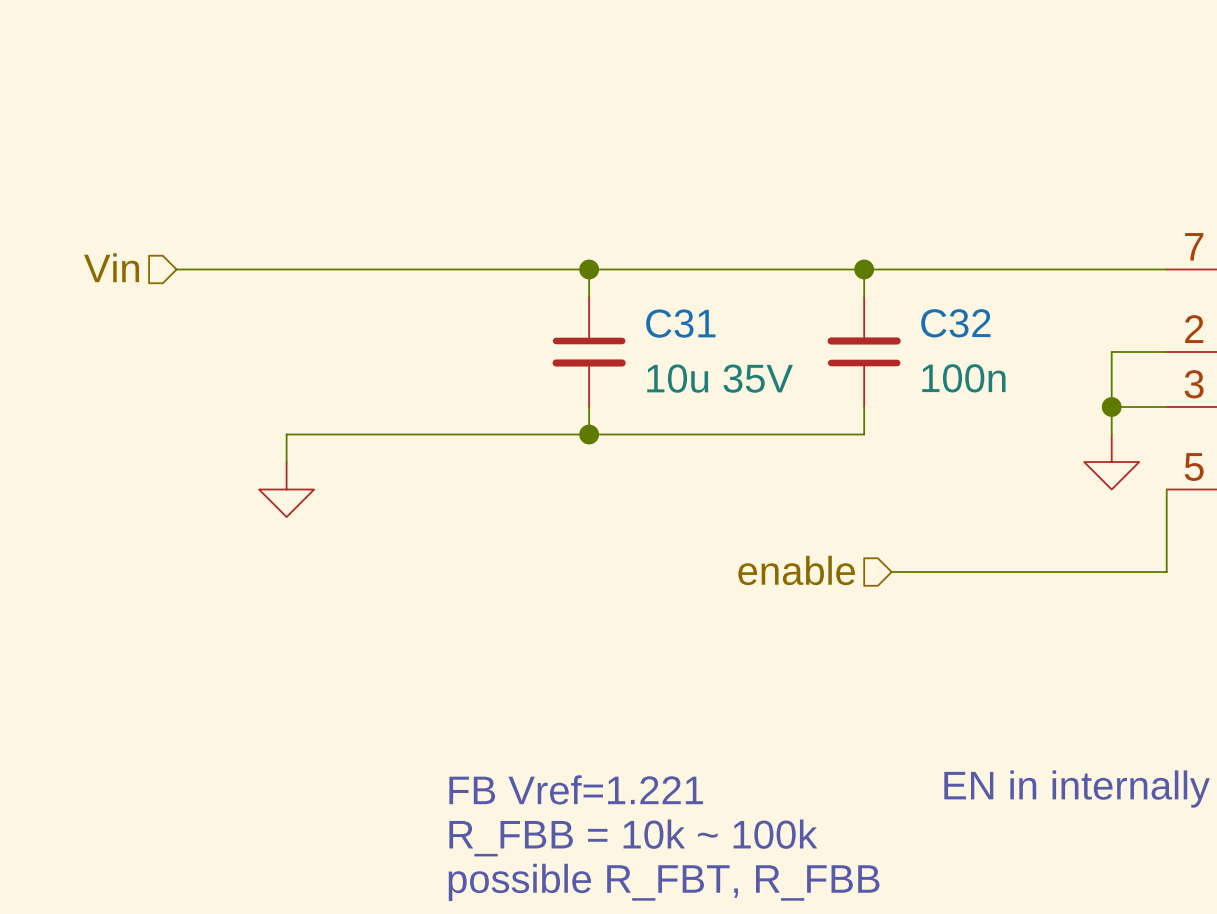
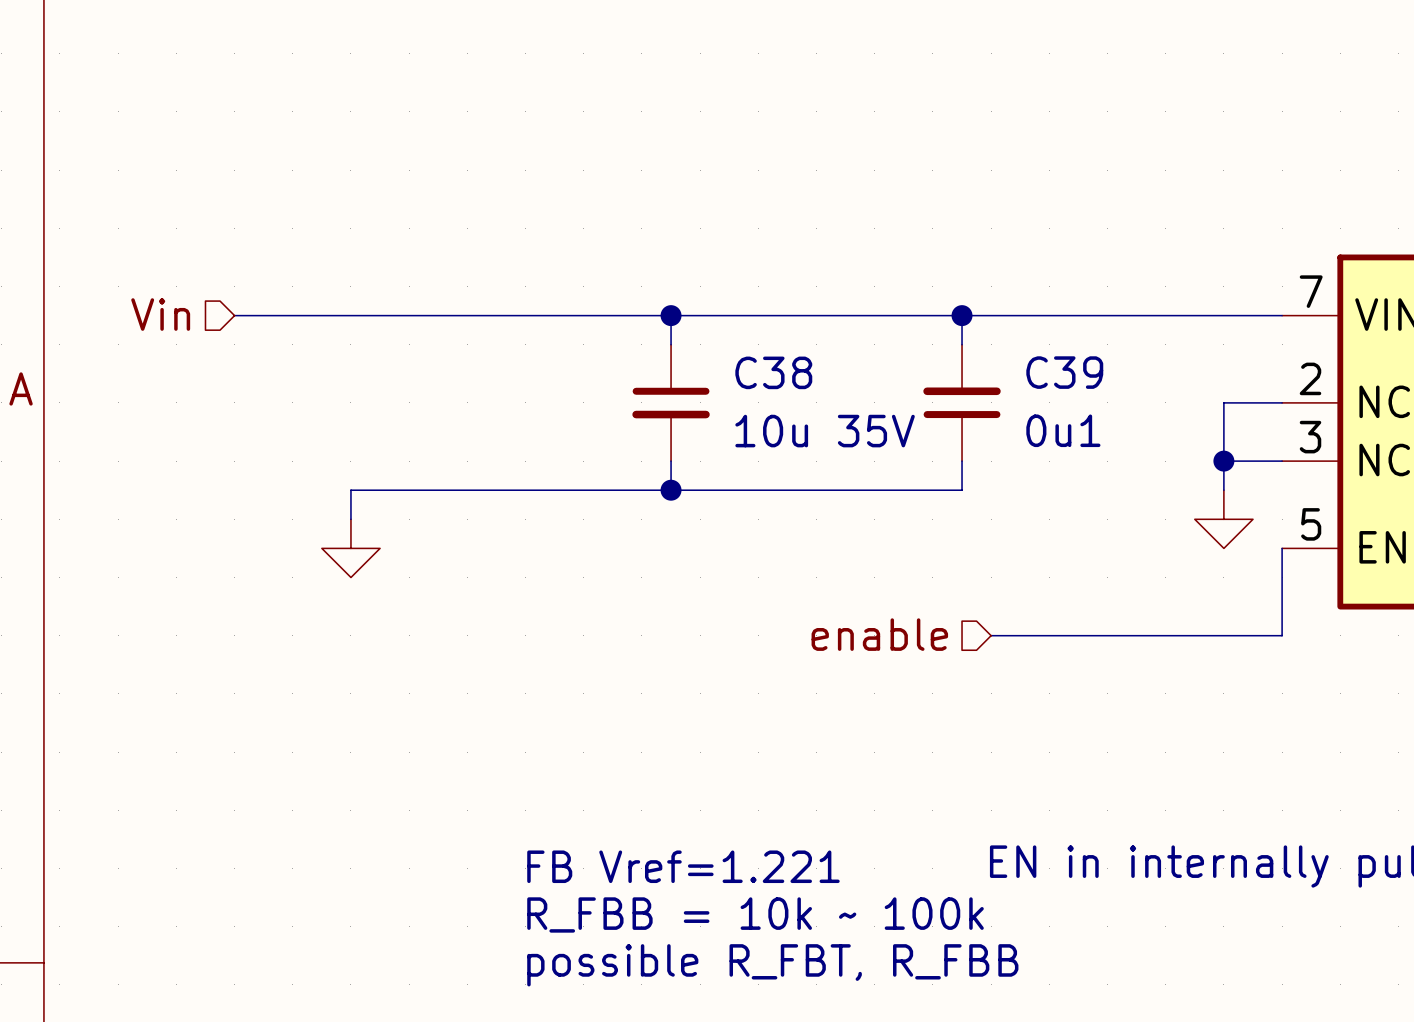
C31 name: C31 (680, 323) -> C38 (773, 372)
C32 name: C32 (955, 323) -> C39 (1064, 372)
C32 value: 100n (963, 378) -> 0u1 (1063, 430)

